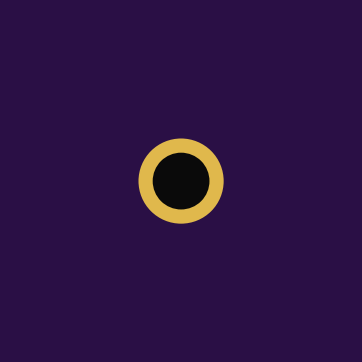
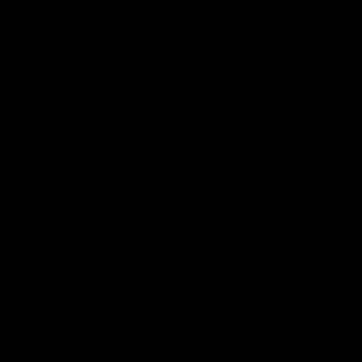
part: (181, 181) -> none

